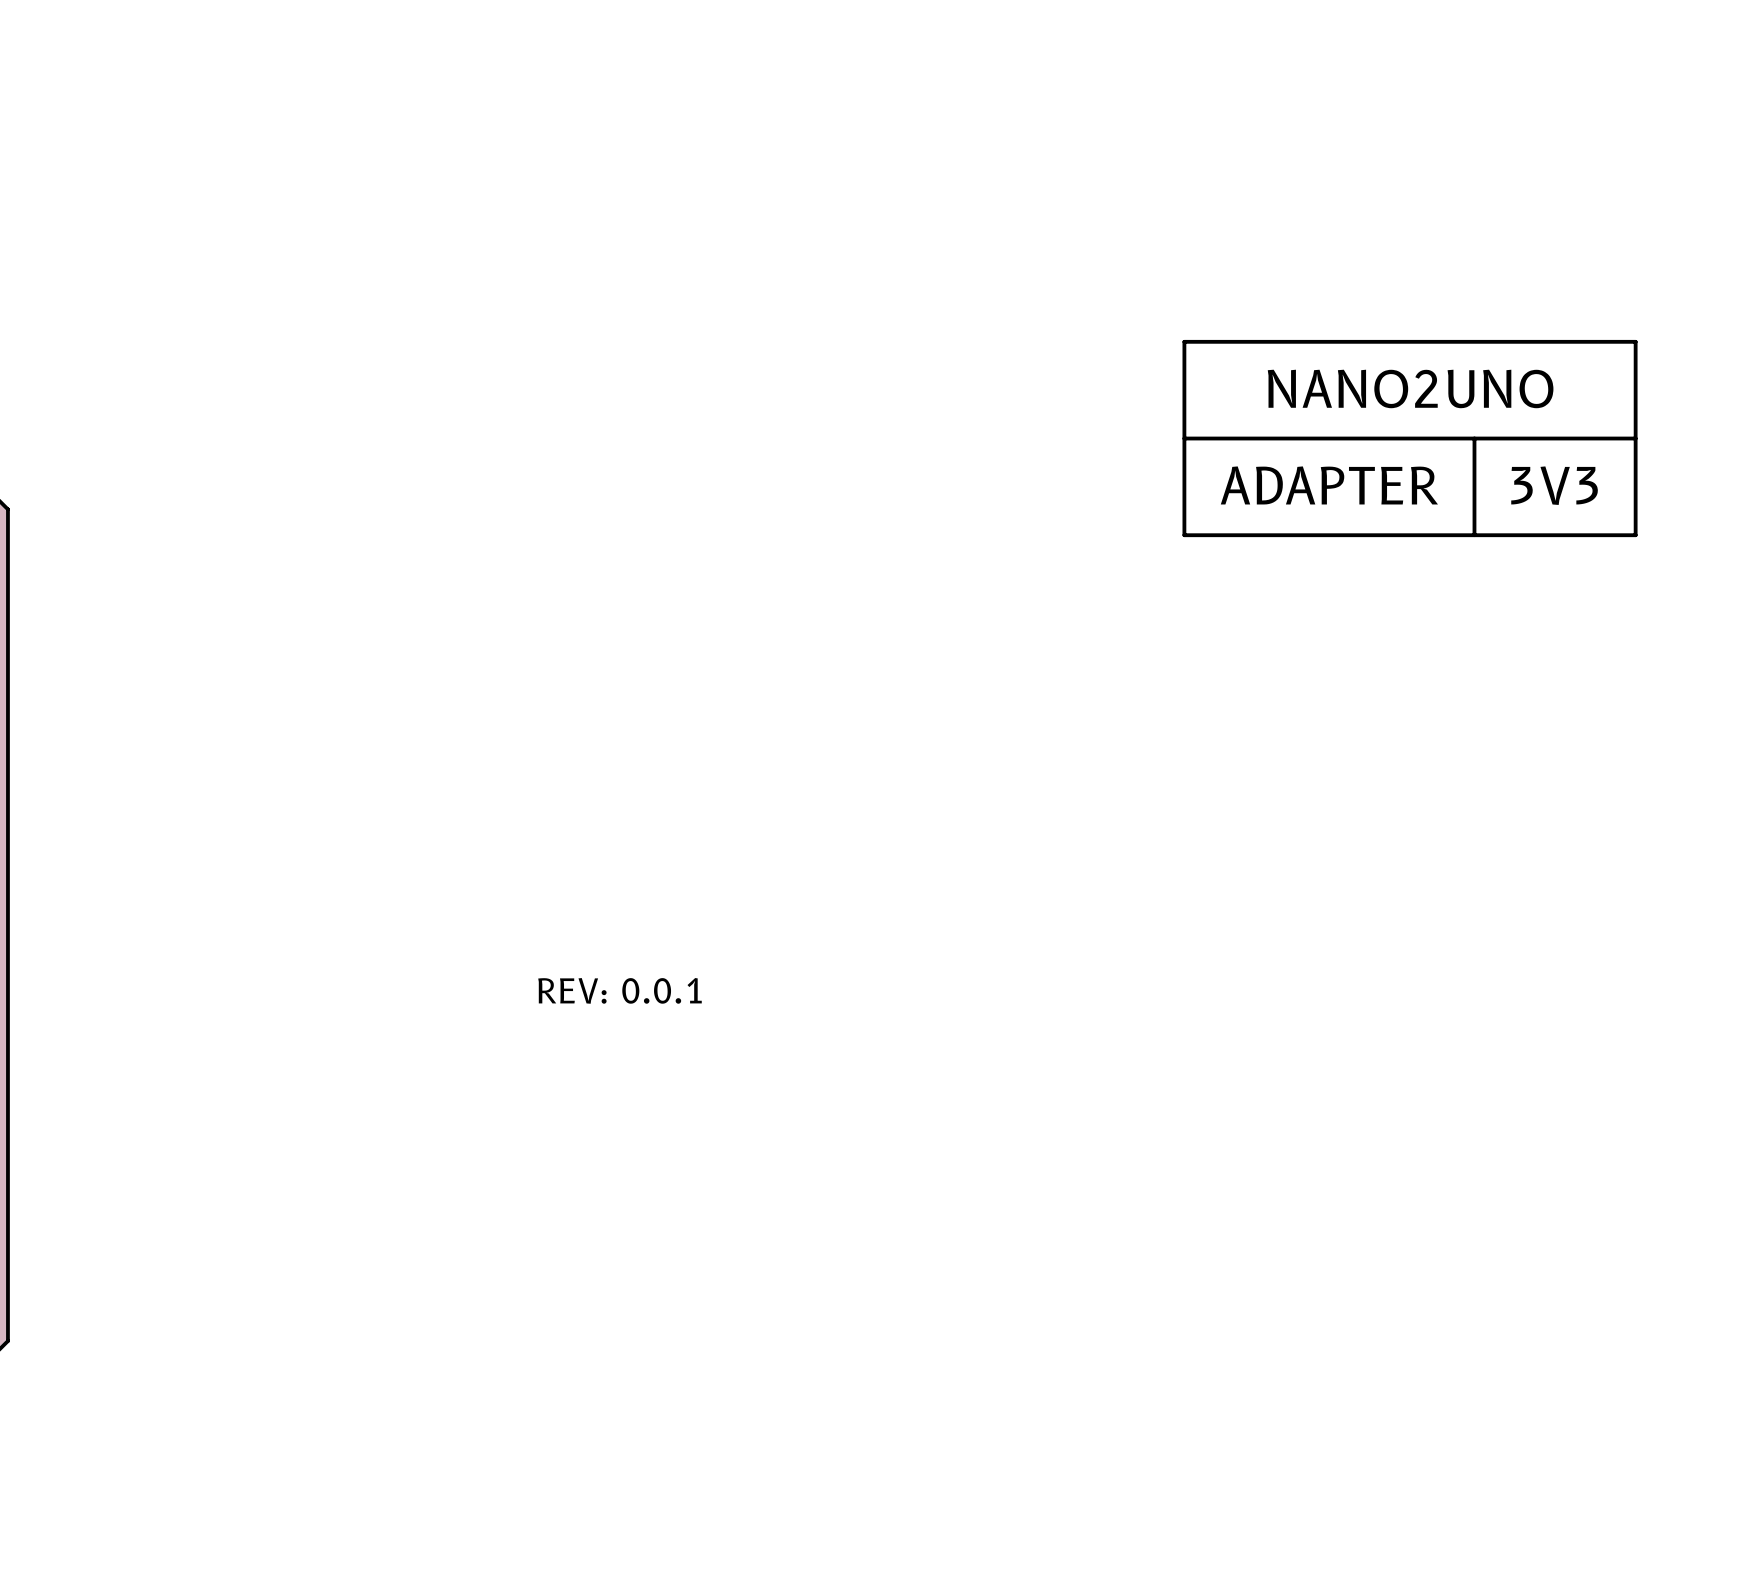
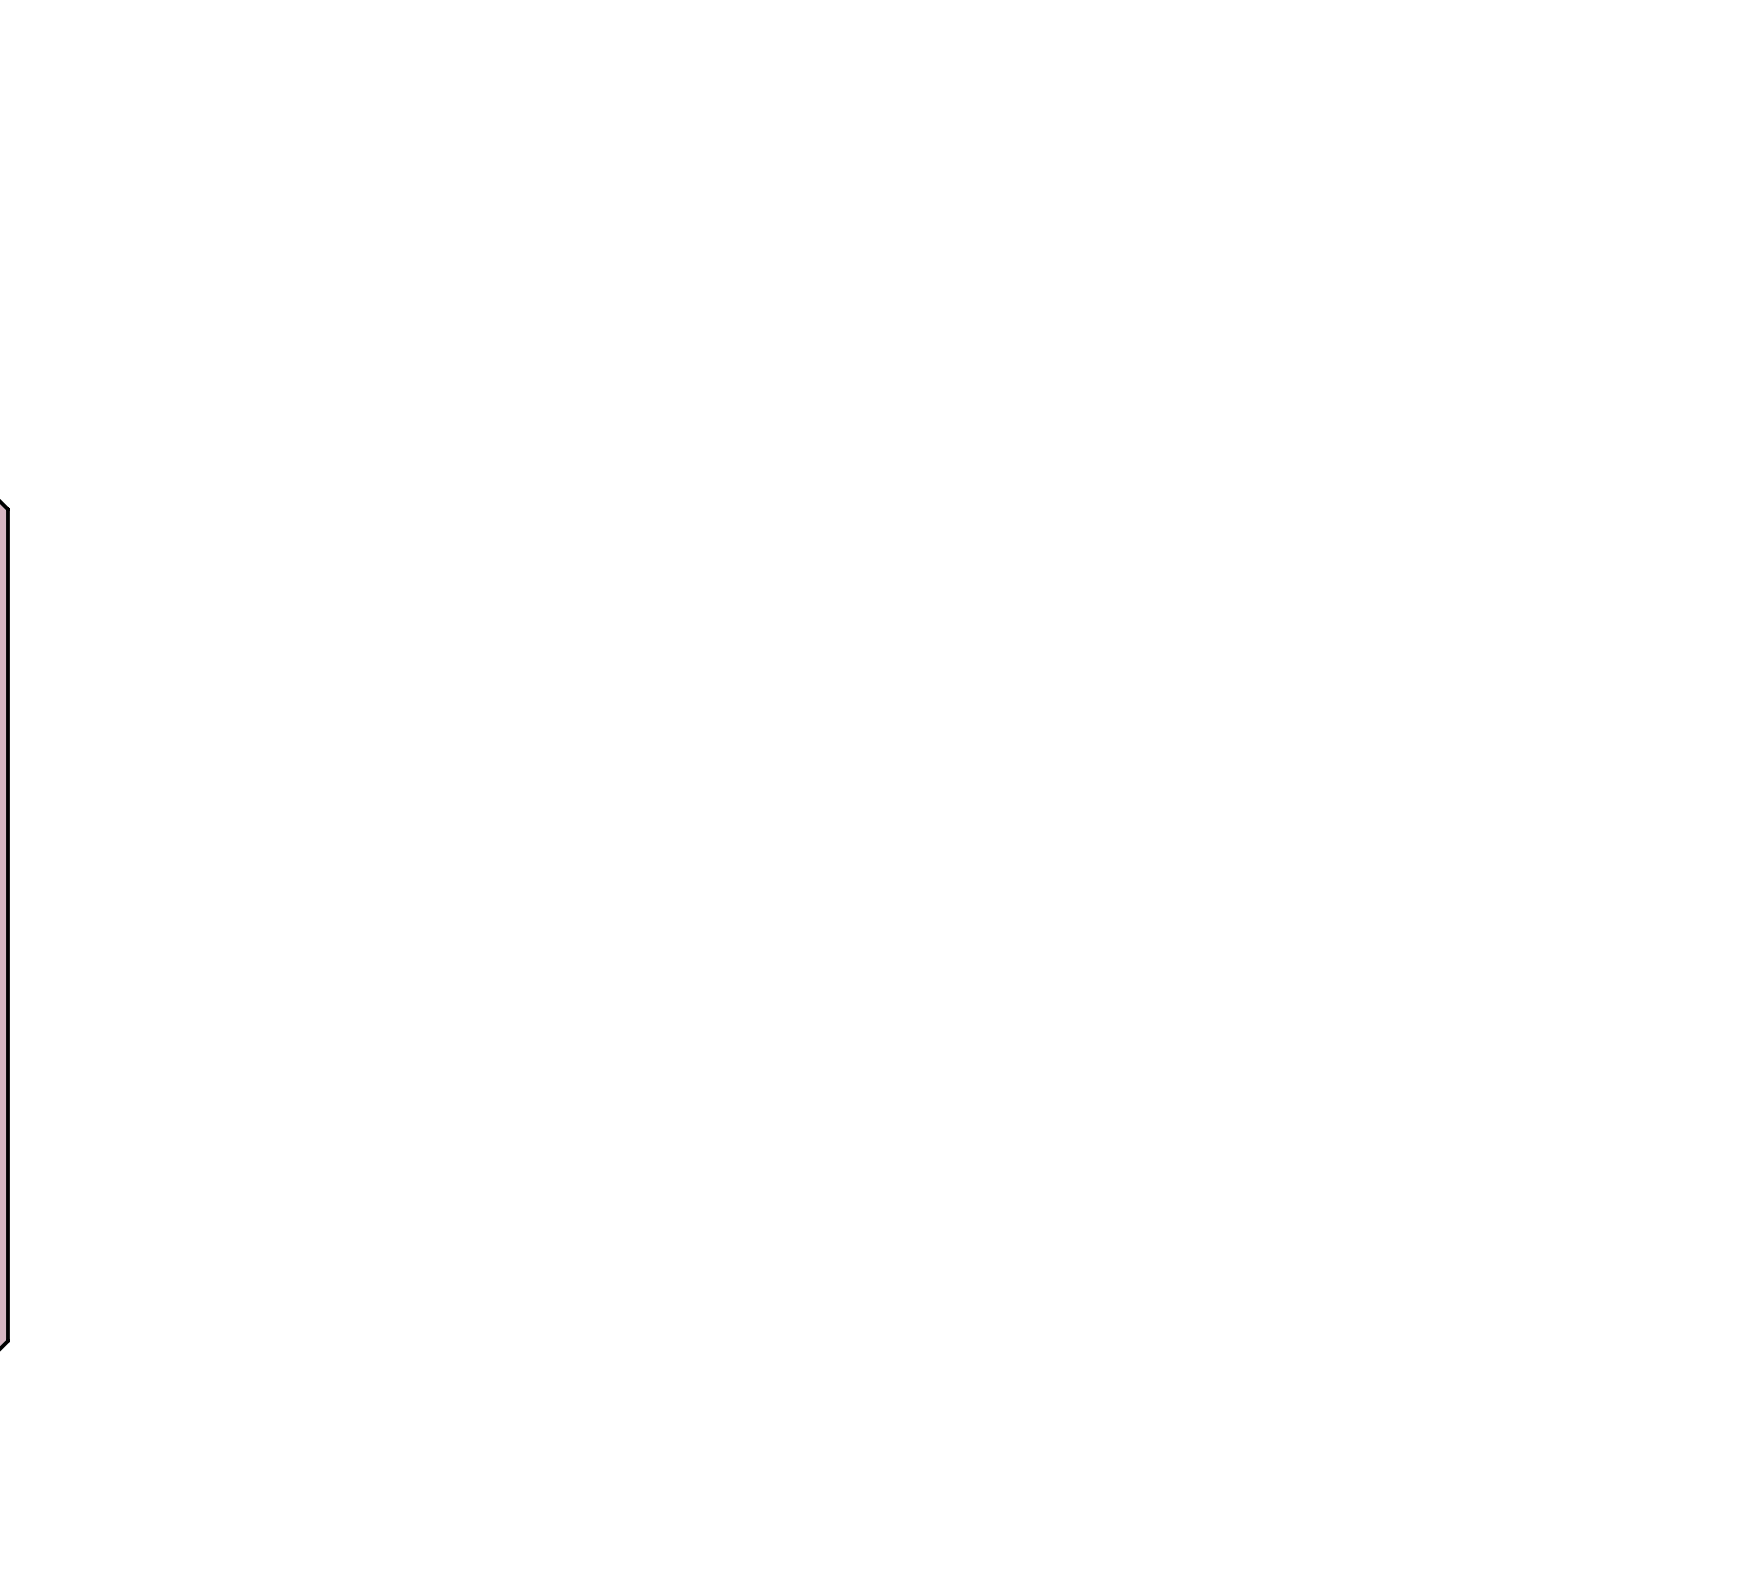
line: (1184, 341) (1635, 341) (1635, 535) (1184, 535) (1184, 341) -> none
text: NANO2UNO (1410, 388) -> none
line: (1184, 438) (1635, 438) -> none
line: (1474, 438) (1474, 535) -> none
text: ADAPTER (1329, 485) -> none
text: 3V3 (1554, 485) -> none
text: REV: 0.0.1 (620, 990) -> none

